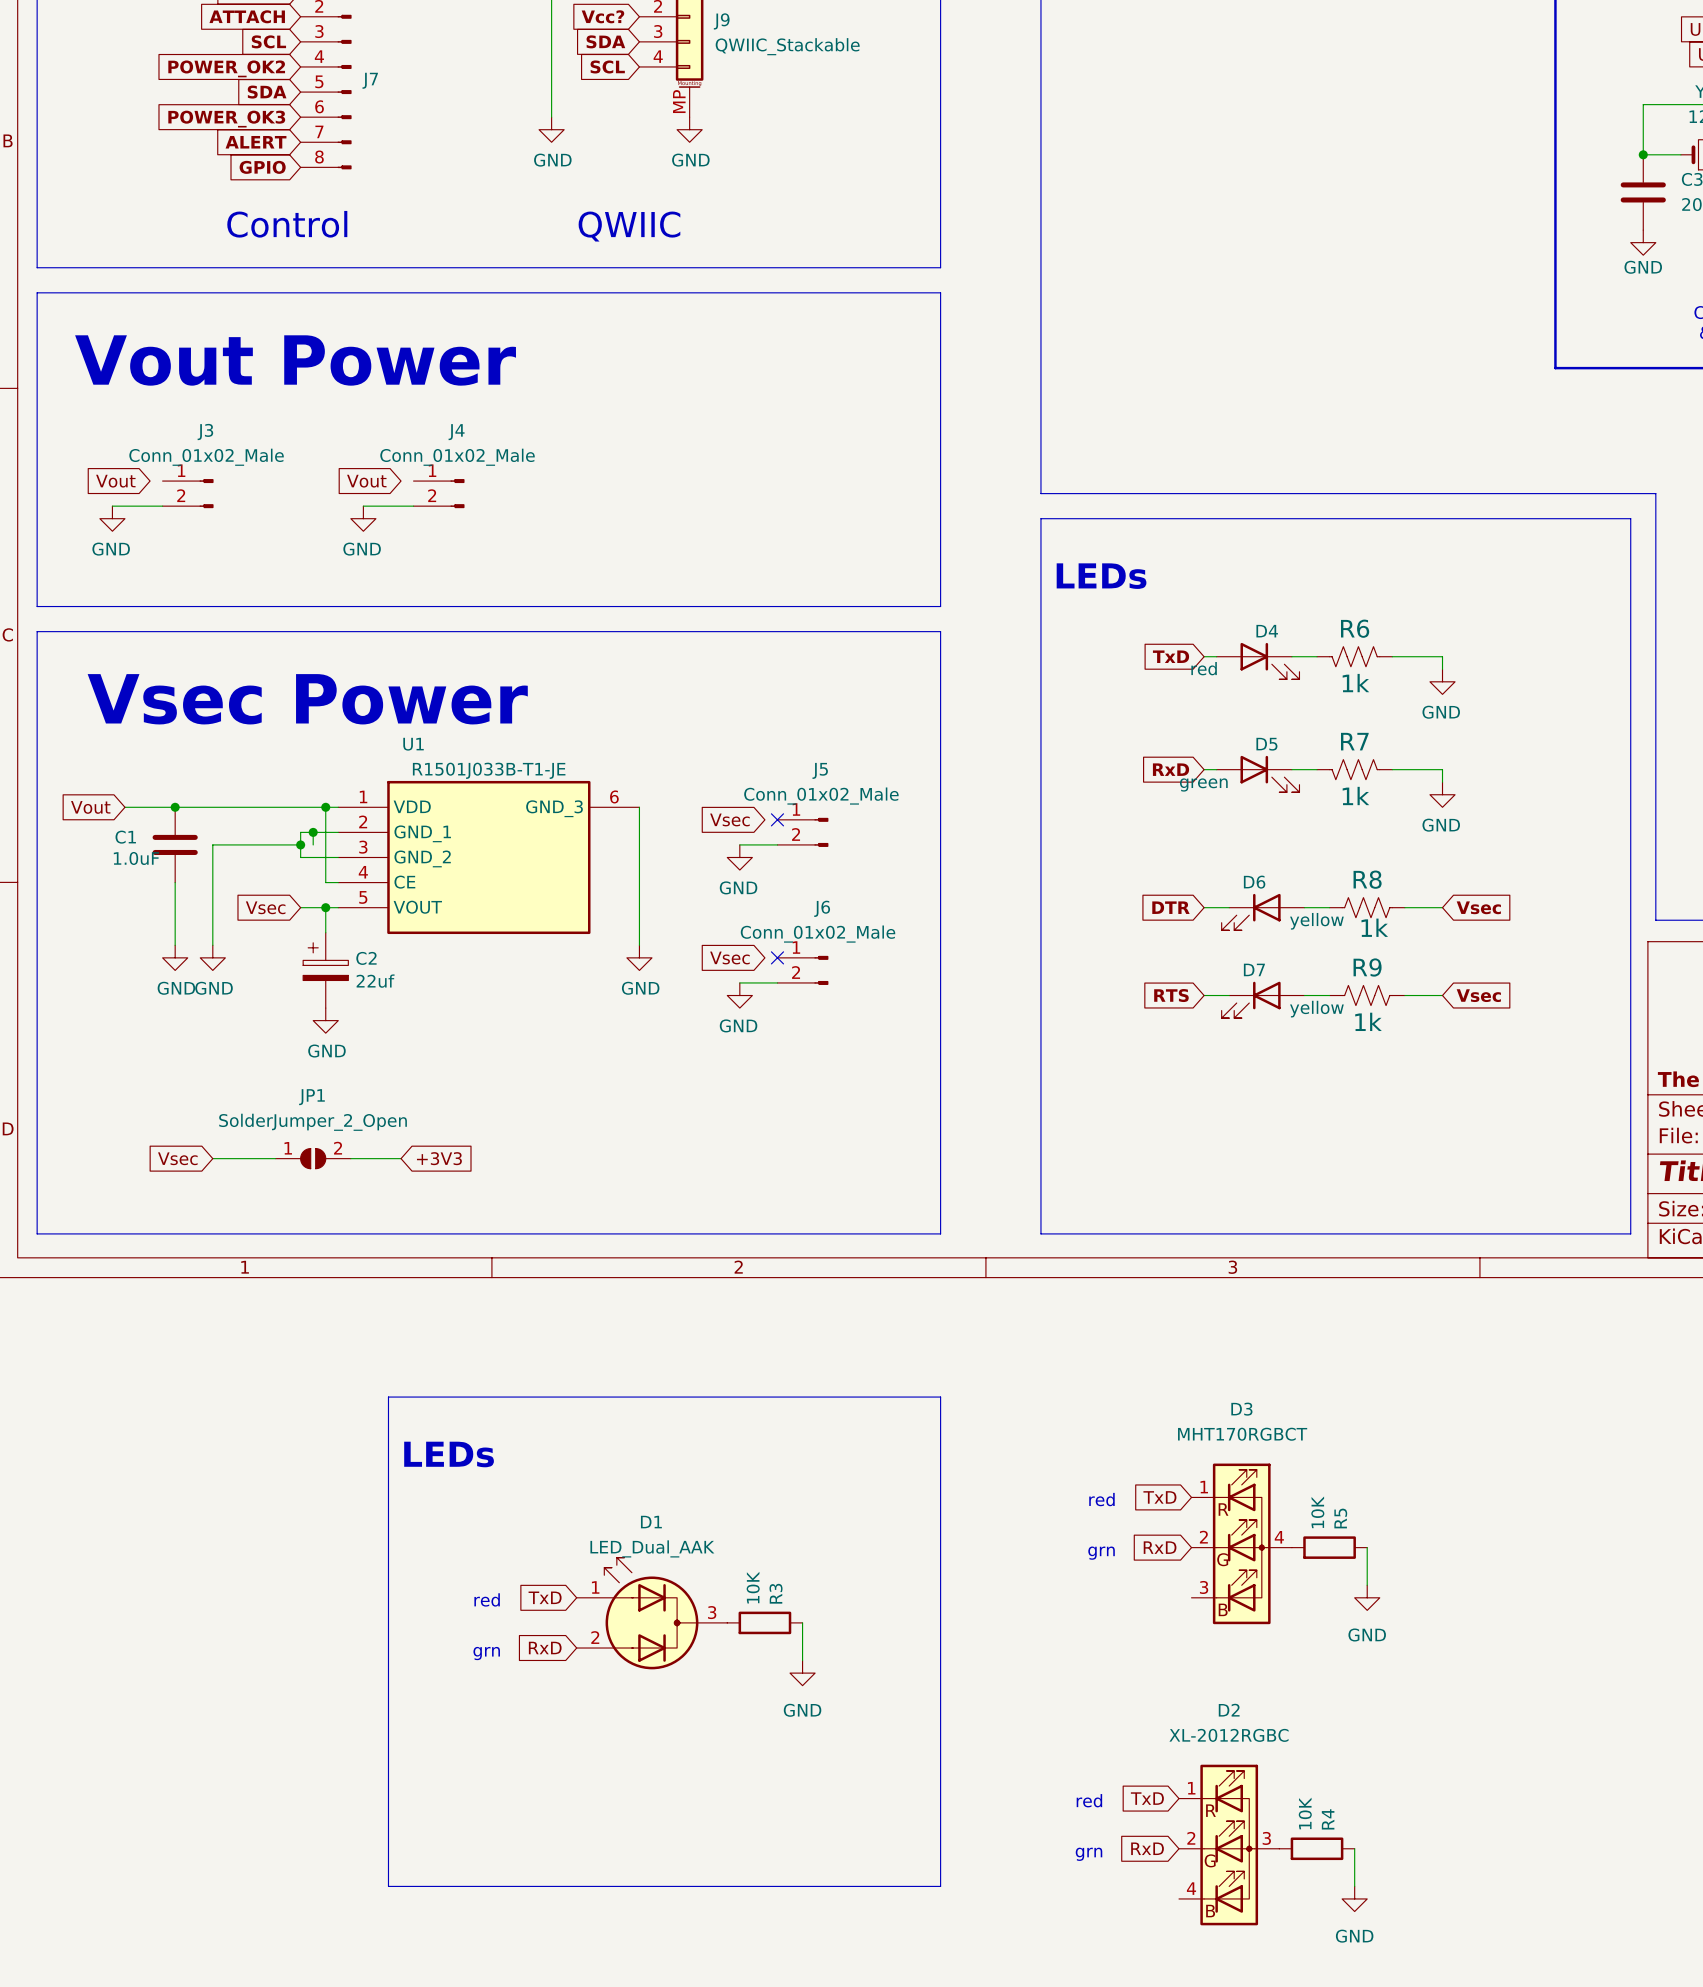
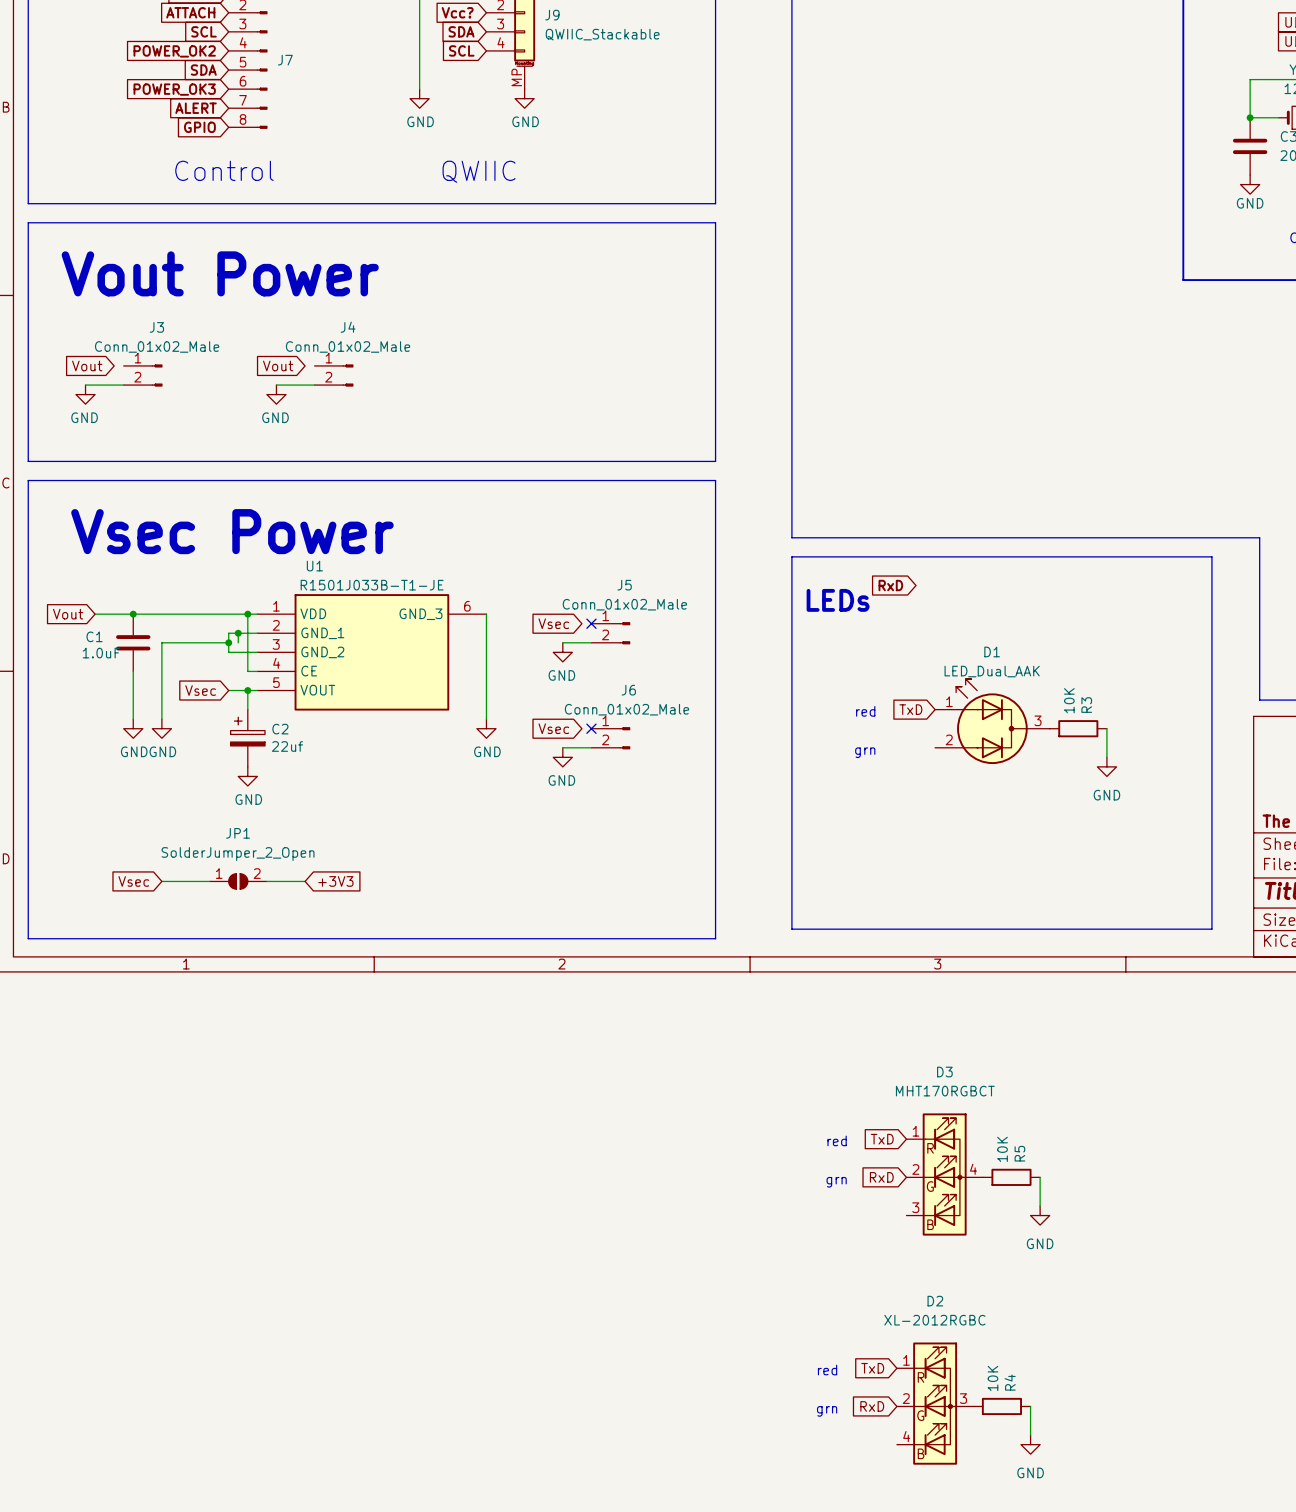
line: (1040, 493) (1655, 493) (1655, 706) -> (791, 537) (1259, 537)
line: (1040, 518) (1630, 518) (1630, 1233) (1040, 1233) (1040, 1221) -> (791, 556) (1211, 556) (1211, 929) (791, 929)
text position: LEDs (1101, 576) -> LEDs (838, 600)
global label: TxD (1171, 656) -> none
wire: (1204, 656) (1216, 656) -> none
wire: (1291, 656) (1317, 656) -> none
R6: 1k (1354, 656) -> none
wire: (1392, 656) (1442, 656) (1442, 669) -> none
D4: red (1258, 661) -> none
power symbol: GND (1442, 681) -> none
line: (1040, 706) (1040, 732) -> (791, 375) (791, 394)
wire: (1204, 769) (1216, 769) -> none
wire: (1291, 769) (1317, 769) -> none
R7: 1k (1354, 769) -> none
wire: (1392, 769) (1442, 769) (1442, 782) -> none
D5: green (1258, 774) -> none
power symbol: GND (1442, 794) -> none
global label: DTR (1170, 907) -> none
wire: (1204, 907) (1229, 907) -> none
wire: (1304, 907) (1329, 907) -> none
R8: 1k (1367, 907) -> none
wire: (1404, 907) (1442, 907) -> none
global label: Vsec (1478, 907) -> none
D6: yellow (1263, 912) -> none
global label: none -> TxD (910, 709)
text: none -> red (865, 711)
wire: none -> (1106, 728) (1106, 757)
text: none -> grn (865, 752)
global label: RTS (1171, 995) -> none
wire: (1204, 995) (1229, 995) -> none
R9: 1k (1367, 995) -> none
wire: (1404, 995) (1442, 995) -> none
global label: Vsec (1478, 995) -> none
D7: yellow (1263, 999) -> none
power symbol: none -> GND (1106, 766)
line: (388, 1397) (940, 1397) (940, 1886) (388, 1886) (388, 1397) -> none
text: LEDs (449, 1454) -> none
global label: TxD (545, 1597) -> none
text: red (487, 1599) -> none
D1 position: (651, 1613) -> (992, 721)
R3 position: (764, 1622) -> (1078, 728)
wire: (802, 1622) (802, 1660) -> none
global label: RxD (545, 1648) -> none
text: grn (486, 1653) -> none
power symbol: GND (802, 1673) -> none

